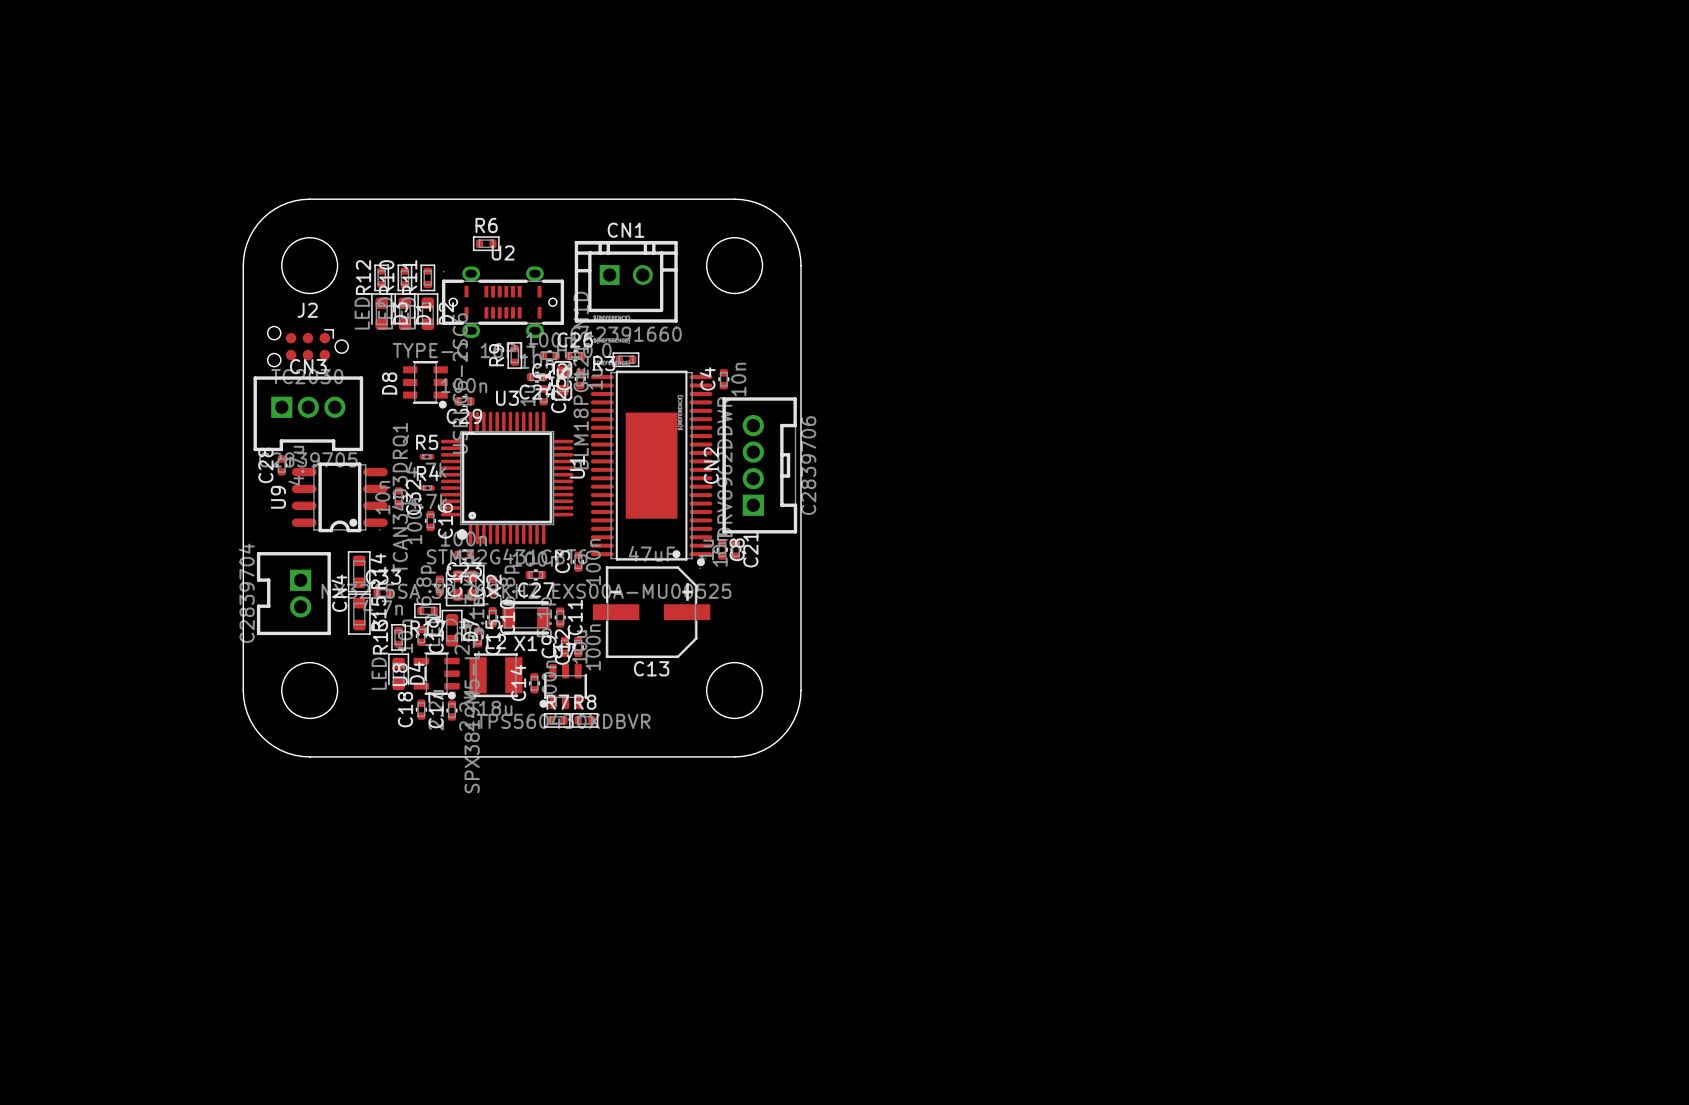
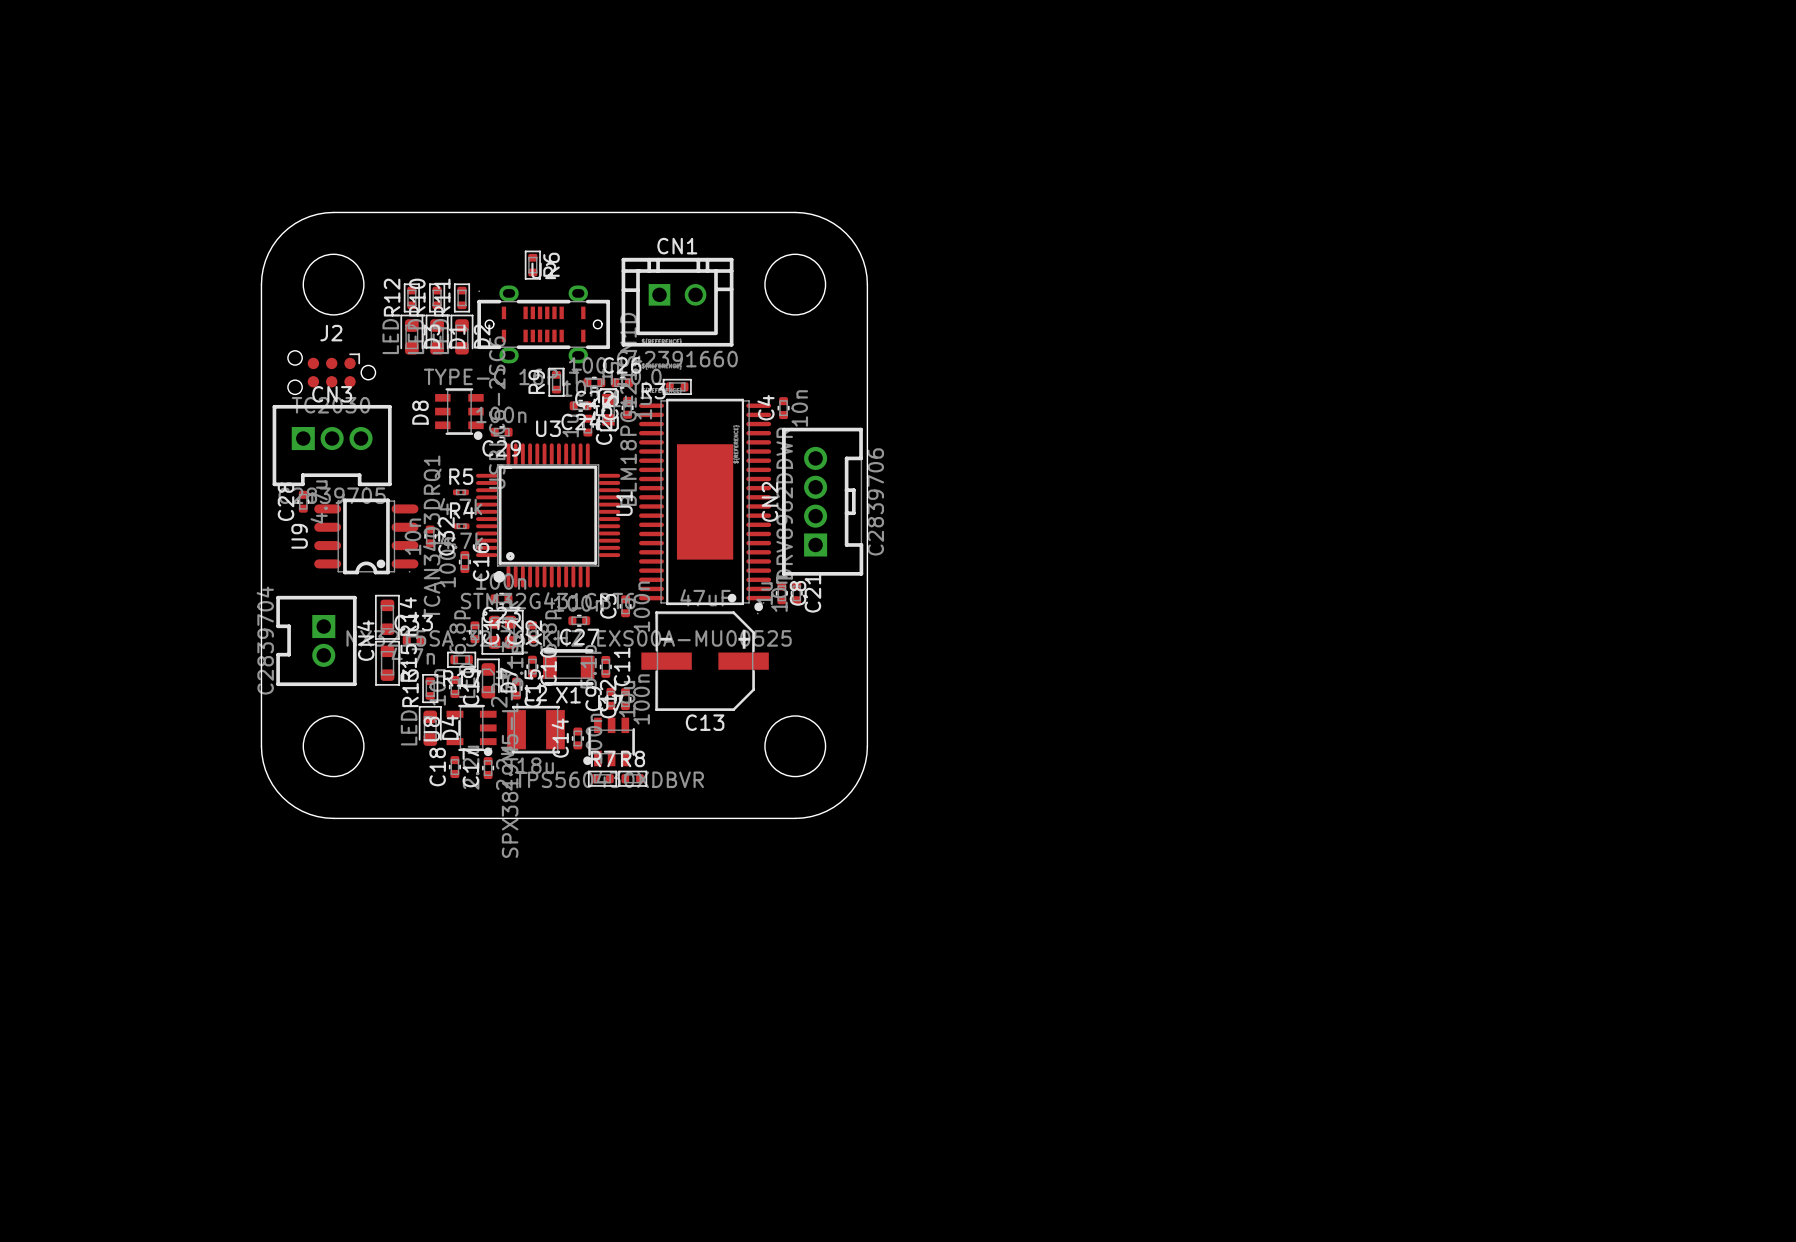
R6 rotation: 0° (486, 243) -> 90° clockwise (532, 265)

